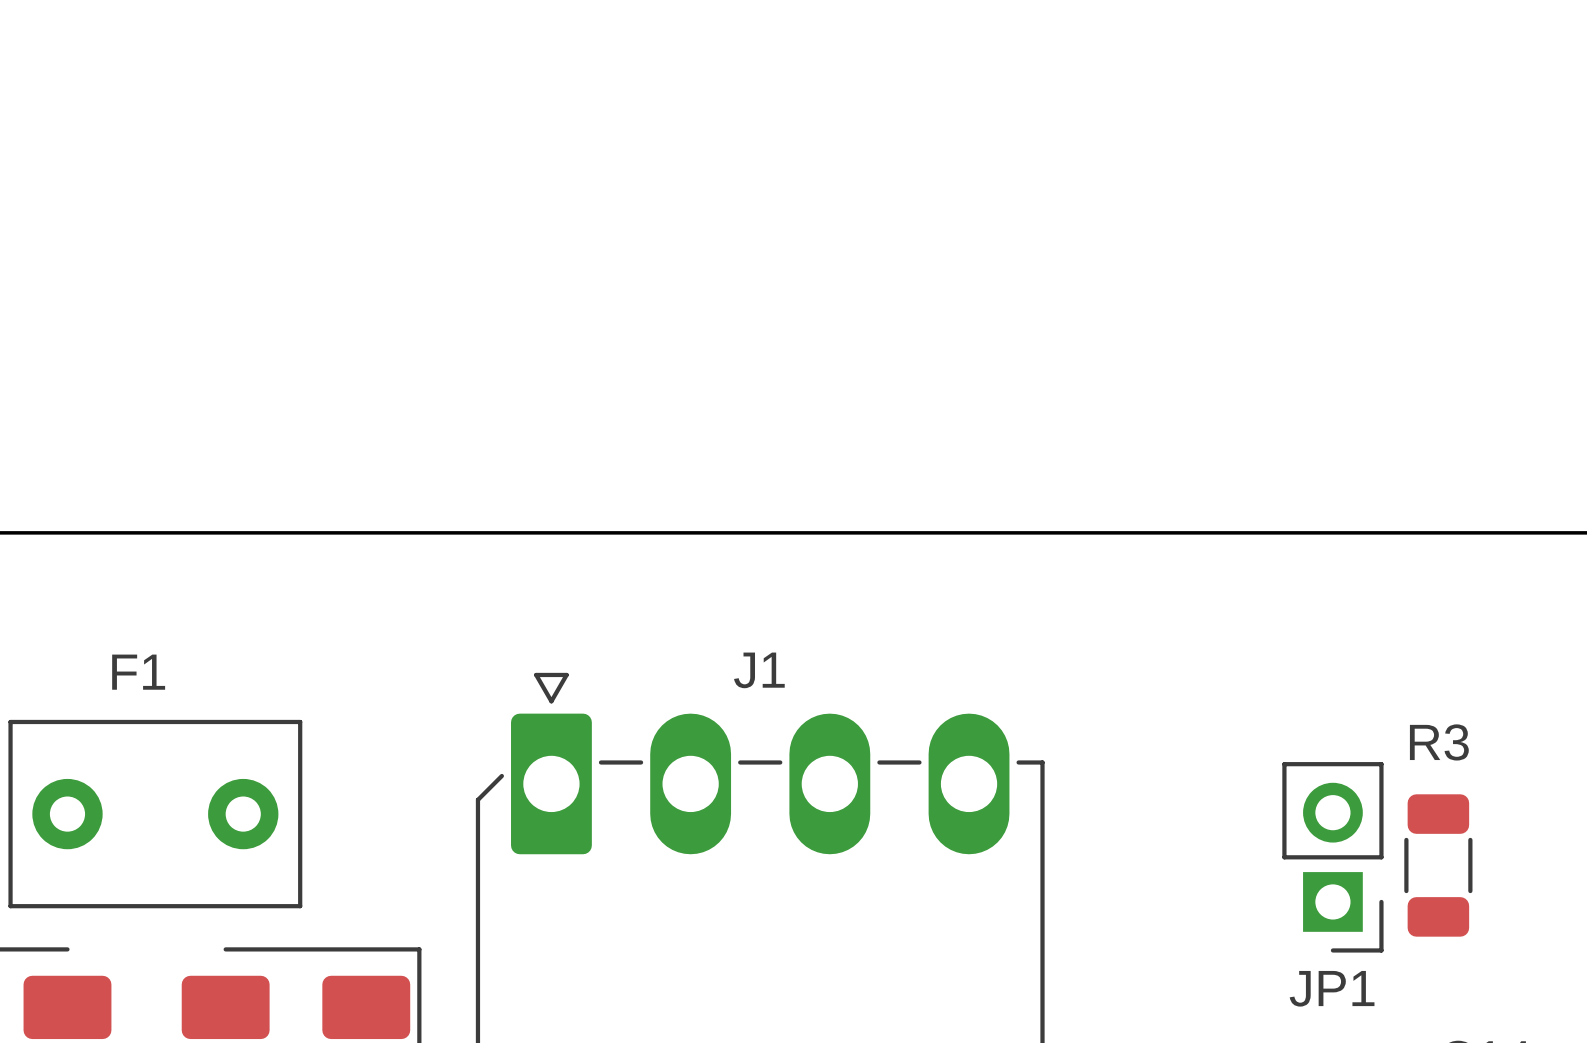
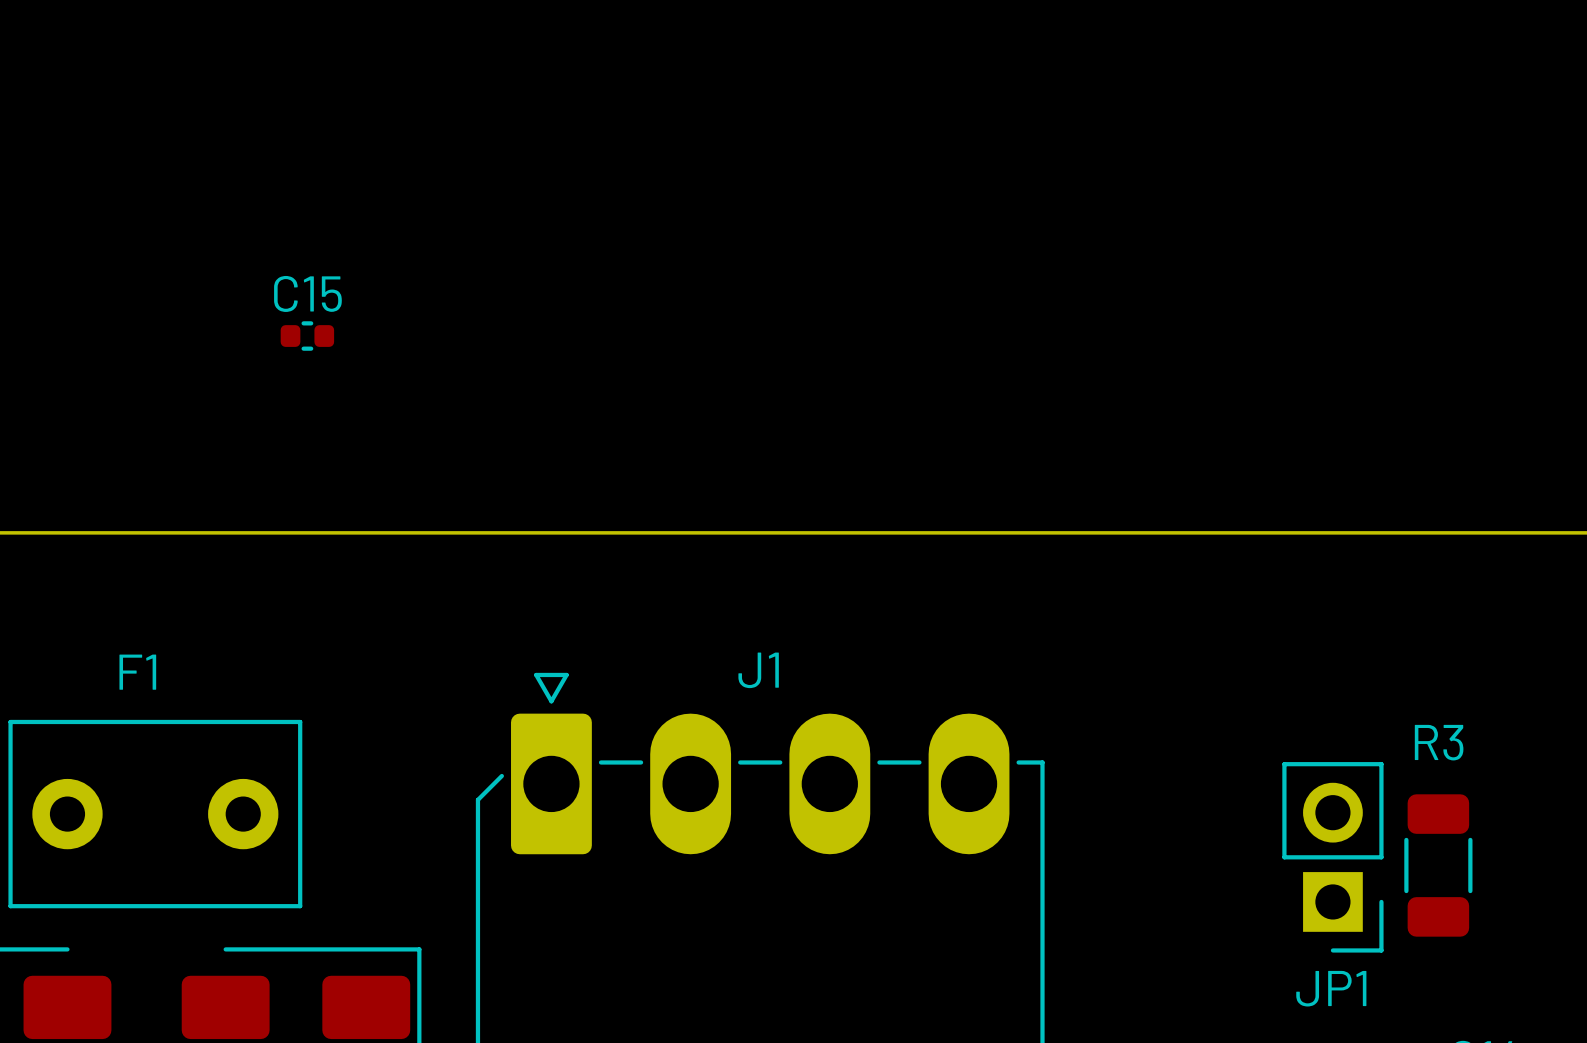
C15: none -> (307, 336)

